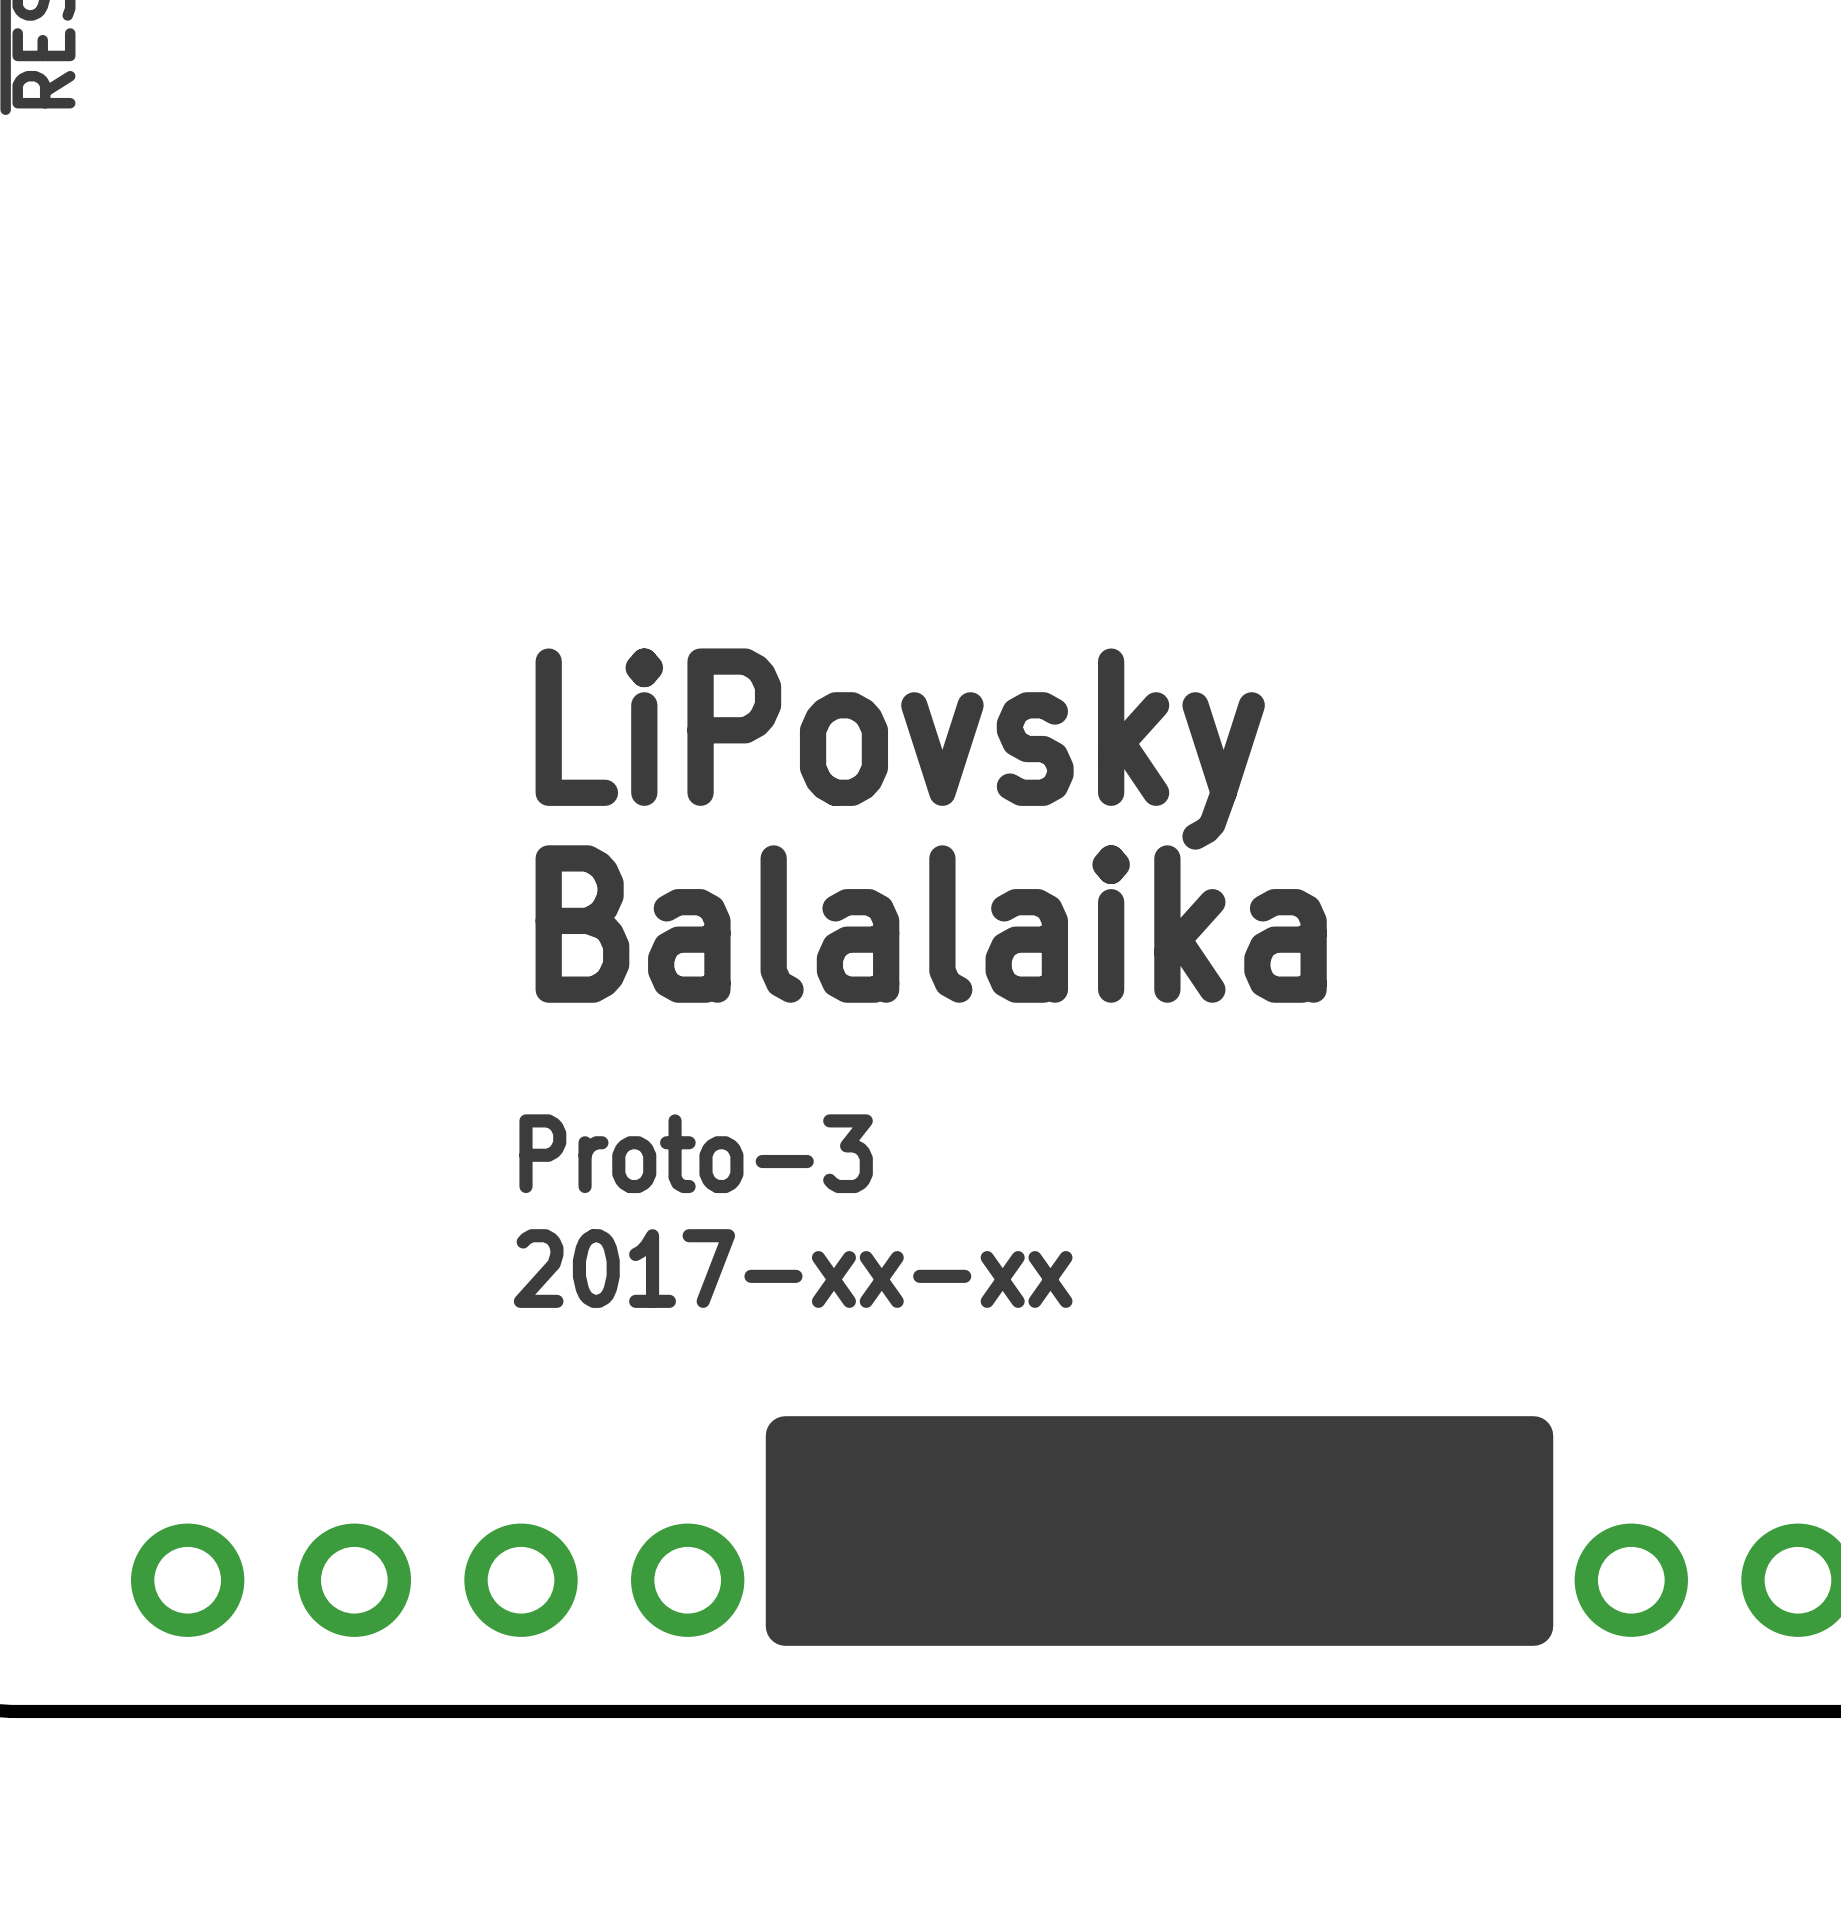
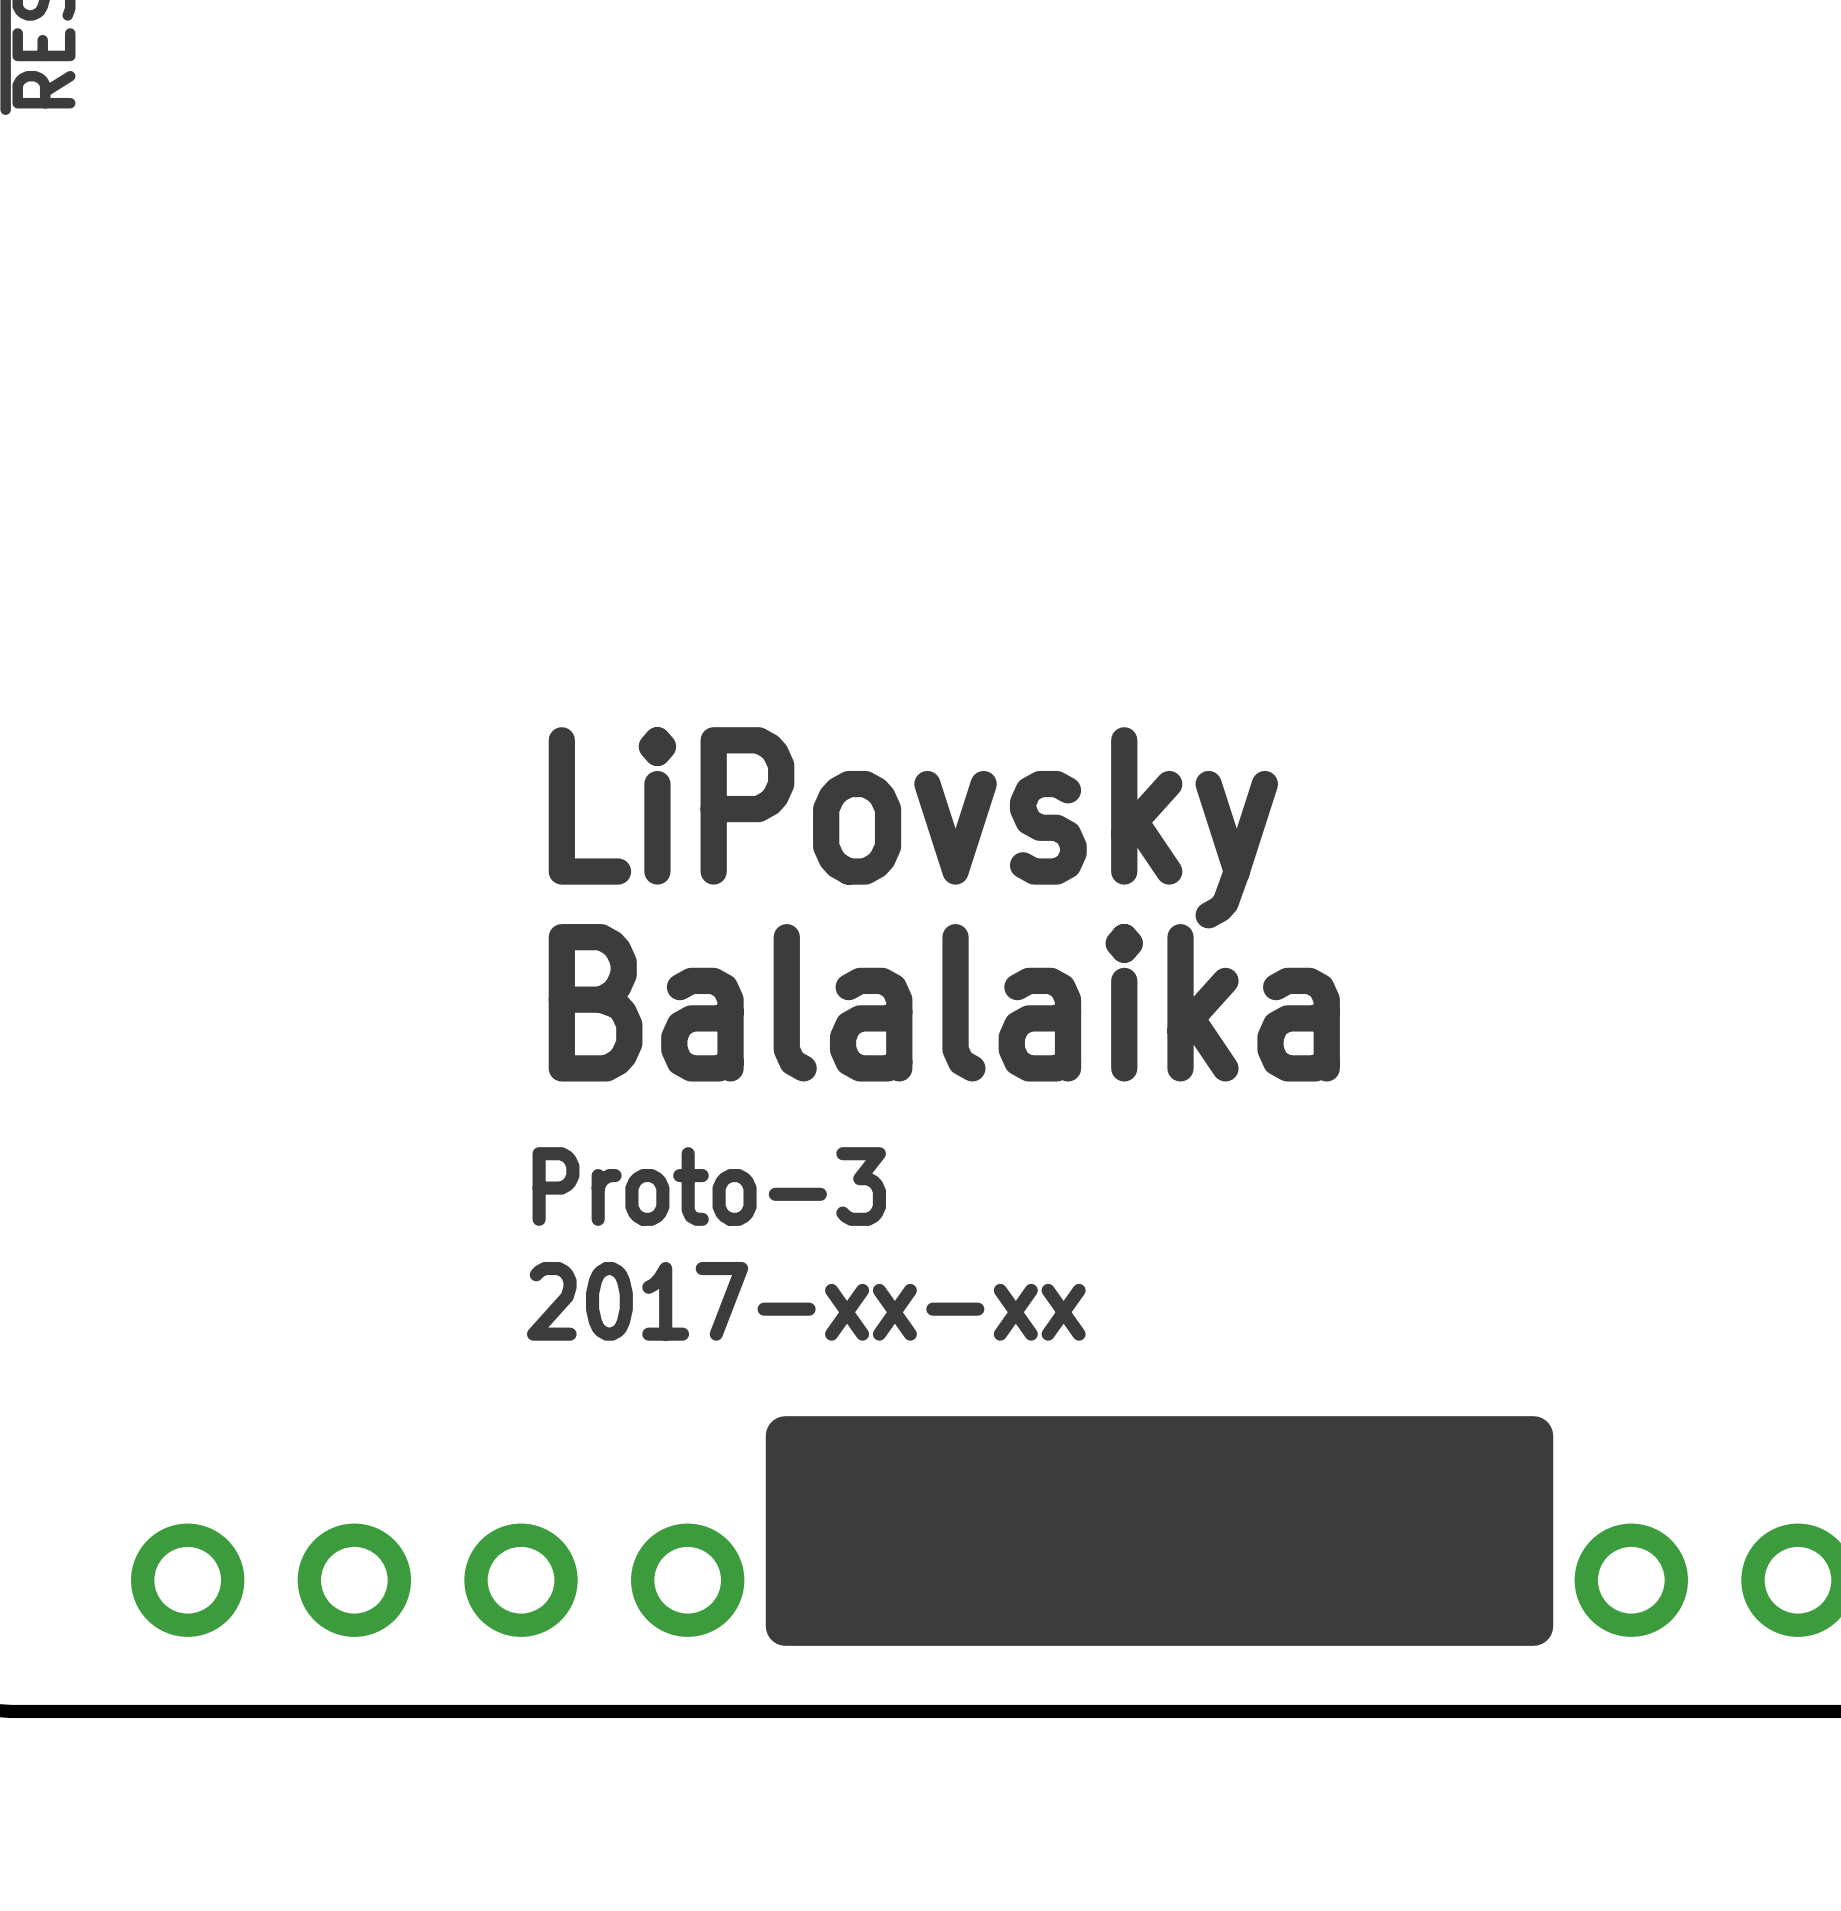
text position: LiPovsky (900, 749) -> LiPovsky (913, 827)
text position: Balalaika (931, 924) -> Balalaika (944, 1002)
text position: Proto-3 (696, 1153) -> Proto-3 (709, 1186)
text position: 2017-xx-xx (793, 1268) -> 2017-xx-xx (806, 1301)

